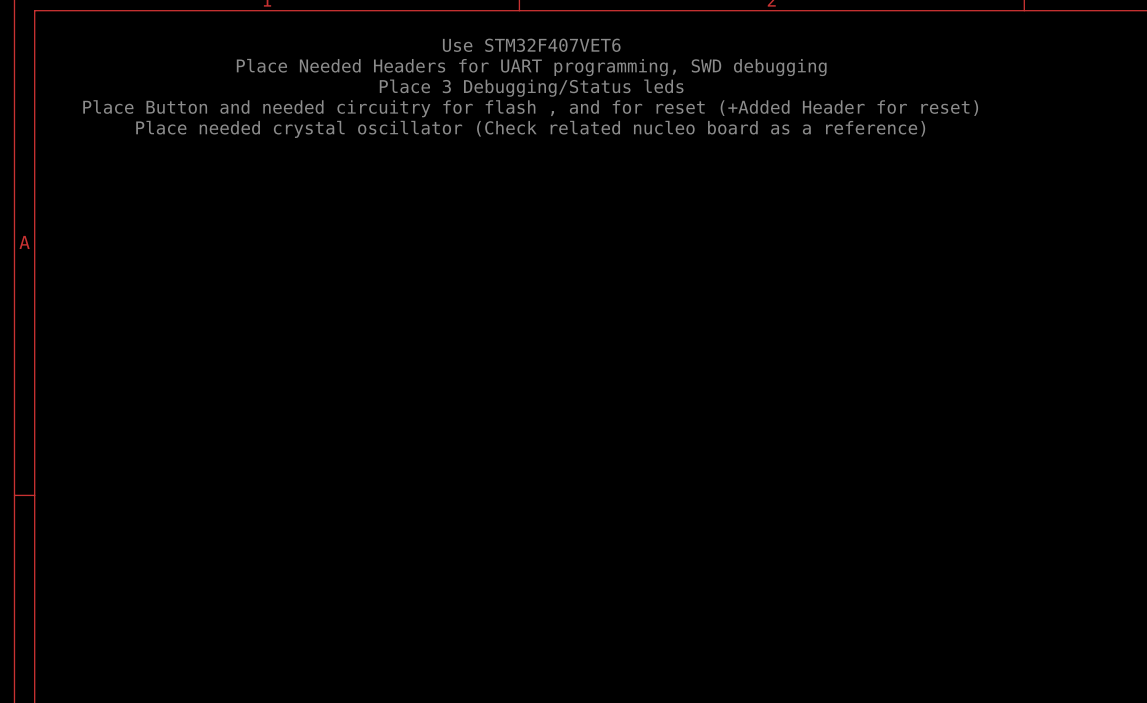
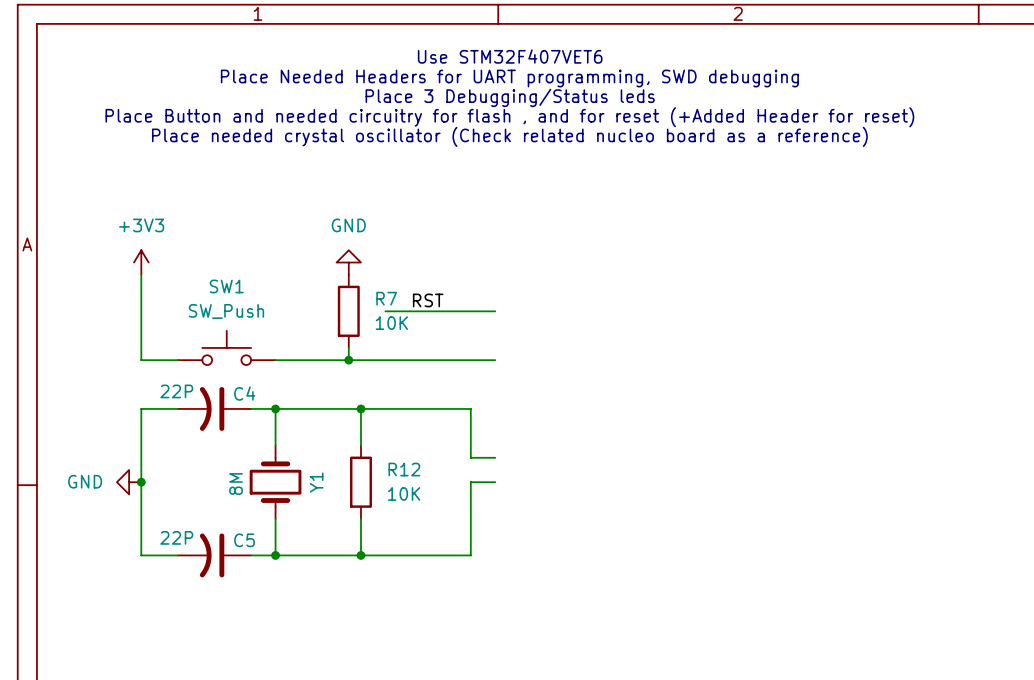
power symbol: none -> +3V3 (141, 262)
power symbol: none -> GND (348, 262)
wire: none -> (141, 274) (141, 360) (177, 360)
label: none -> RST (428, 300)
R7: none -> 10K (348, 311)
wire: none -> (385, 311) (495, 311)
SW1: none -> SW_Push (226, 347)
wire: none -> (348, 347) (348, 360)
wire: none -> (275, 360) (495, 360)
junction: none -> (348, 360)
wire: none -> (177, 408) (141, 408) (141, 555) (177, 555)
C4: none -> 22P (214, 408)
wire: none -> (251, 408) (470, 408) (470, 457) (495, 457)
wire: none -> (275, 408) (275, 445)
junction: none -> (275, 408)
wire: none -> (360, 408) (360, 445)
junction: none -> (360, 408)
power symbol: none -> GND (129, 482)
junction: none -> (141, 482)
Y1: none -> 8M (275, 482)
R12: none -> 10K (360, 482)
wire: none -> (495, 482) (470, 482) (470, 555) (251, 555)
wire: none -> (275, 518) (275, 555)
wire: none -> (360, 518) (360, 555)
C5: none -> 22P (214, 555)
junction: none -> (275, 555)
junction: none -> (360, 555)

